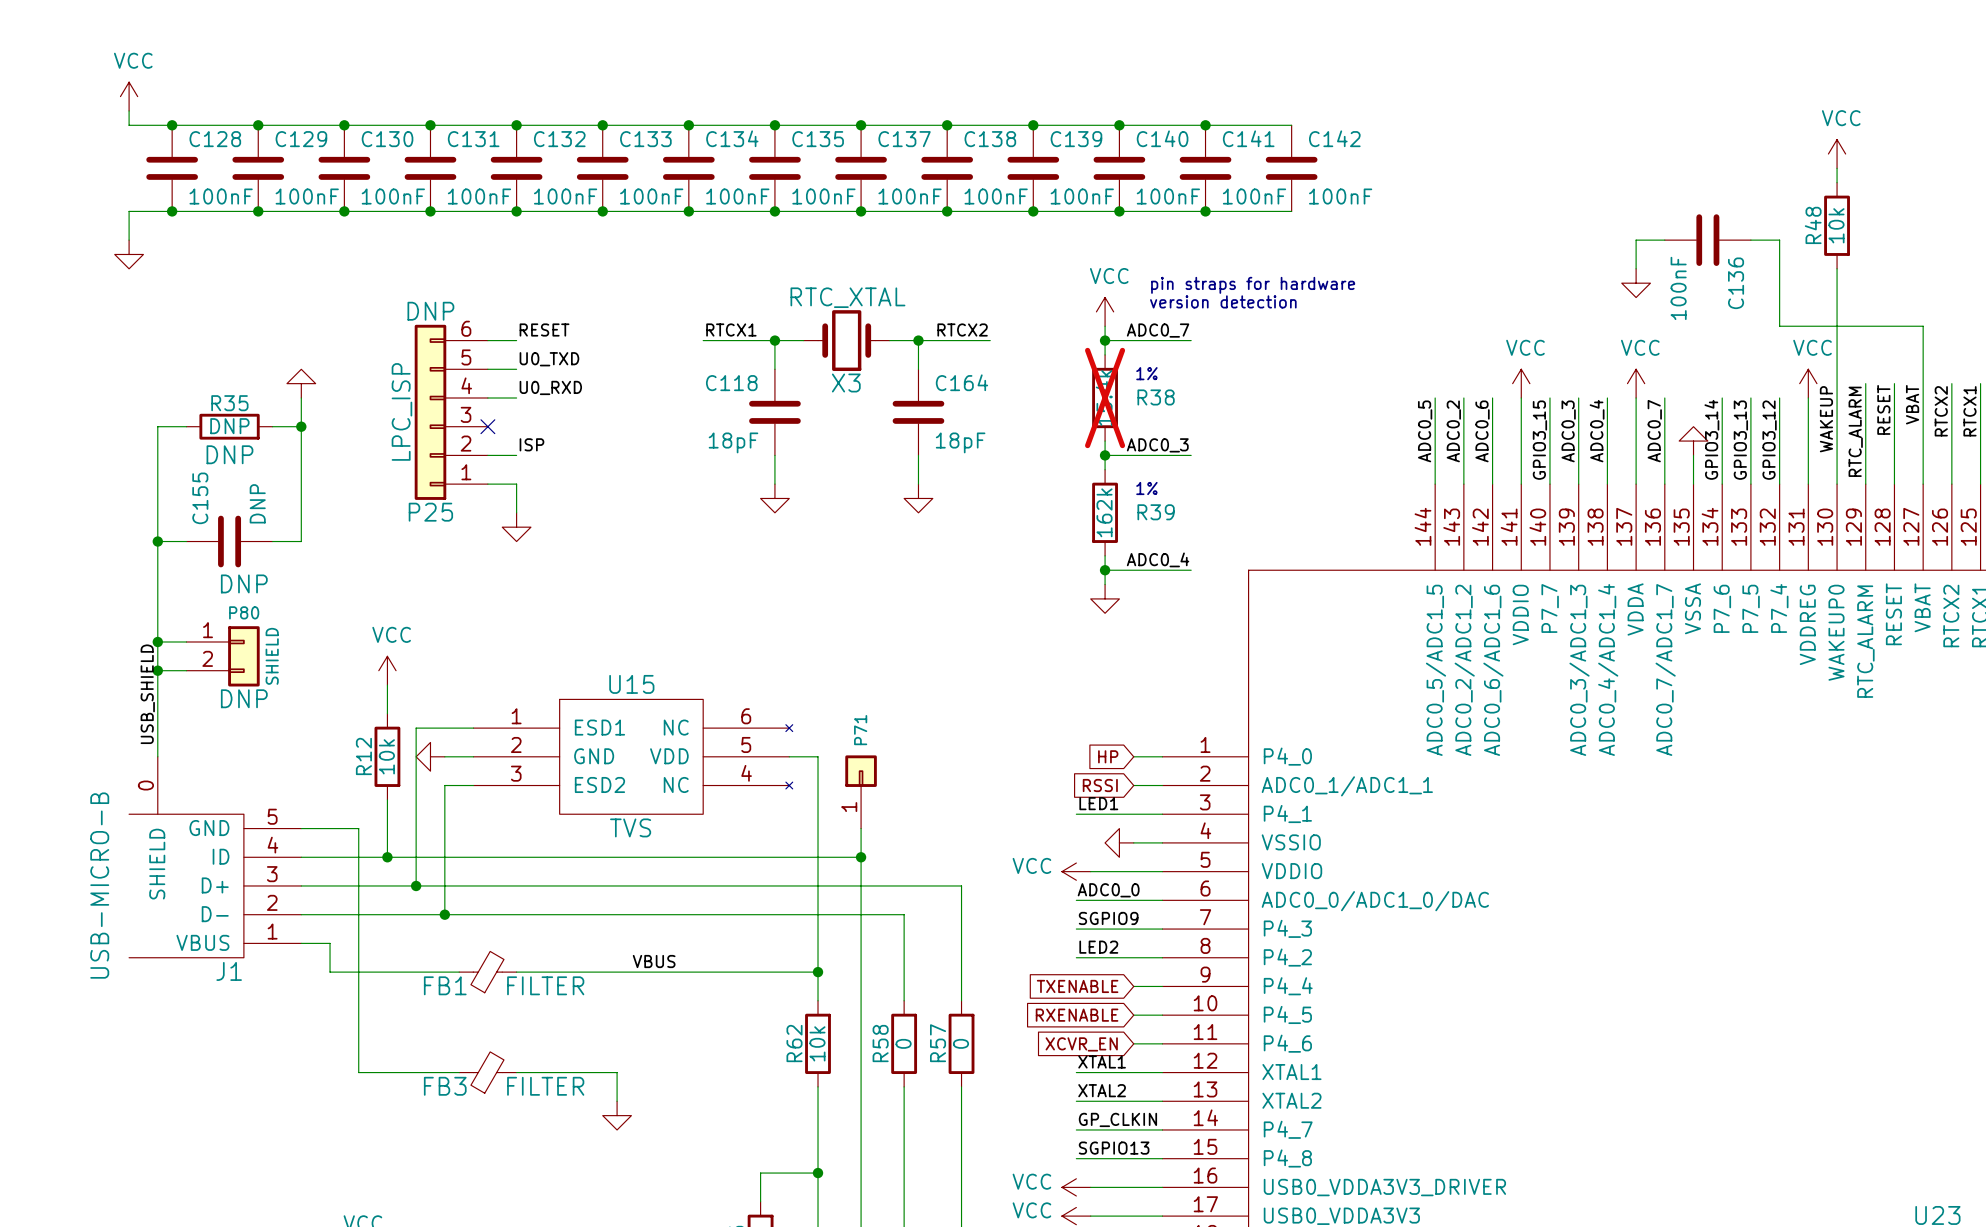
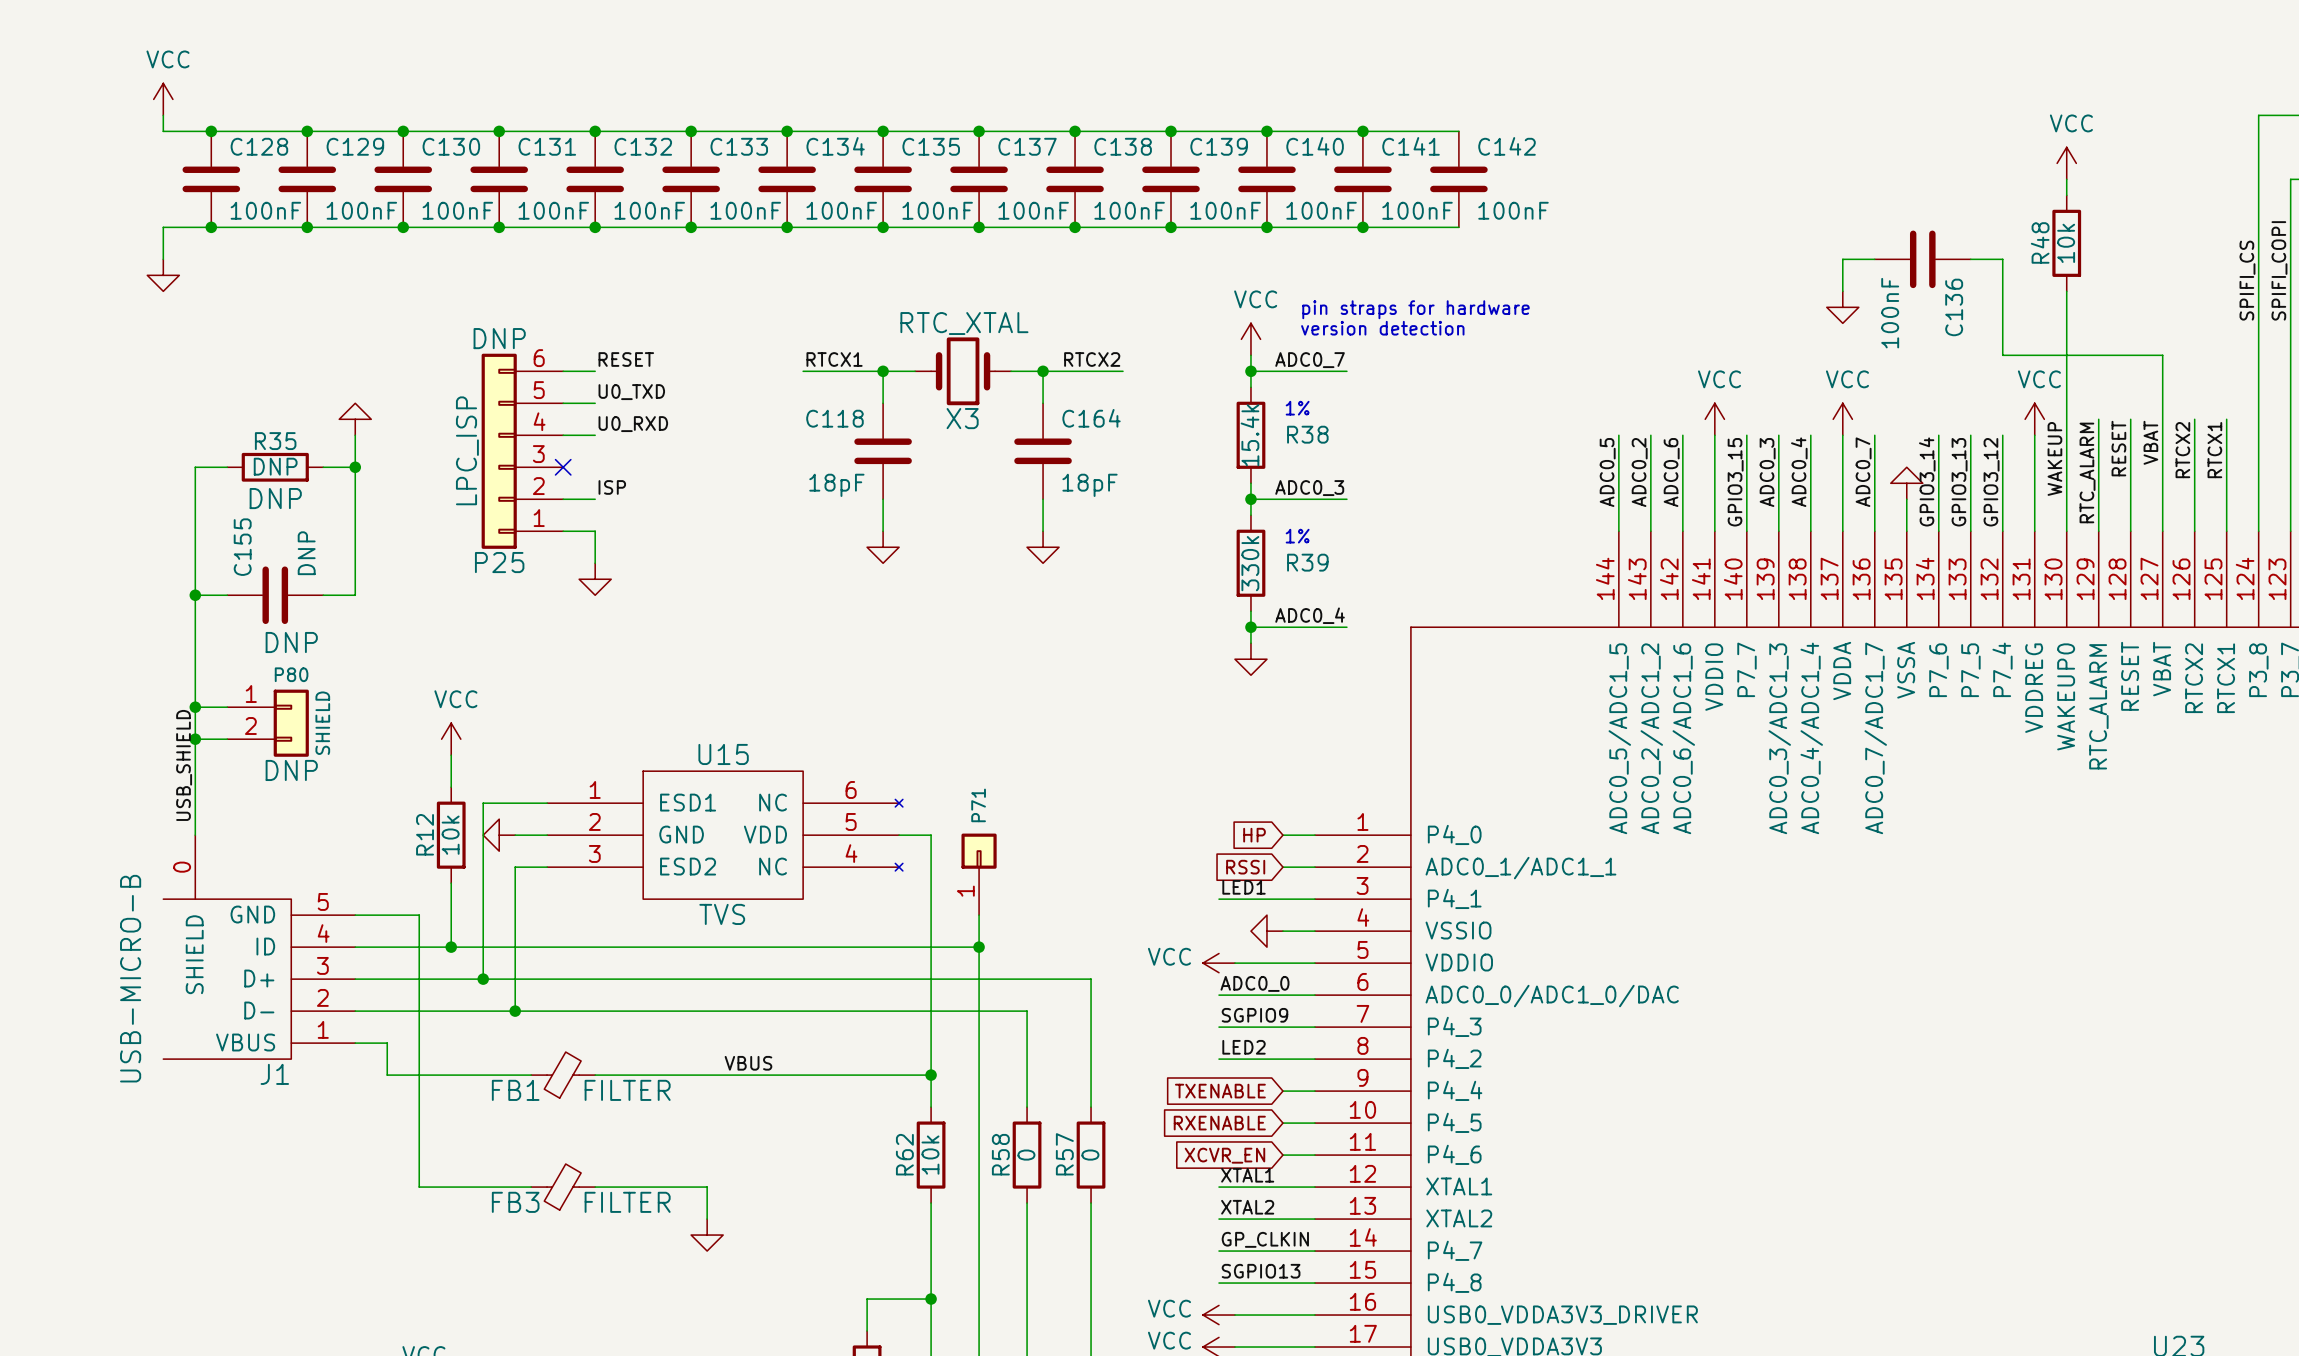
R38 do-not-place cross: (1105, 398) -> none
R39 value: 162k (1104, 512) -> 330k (1250, 563)

